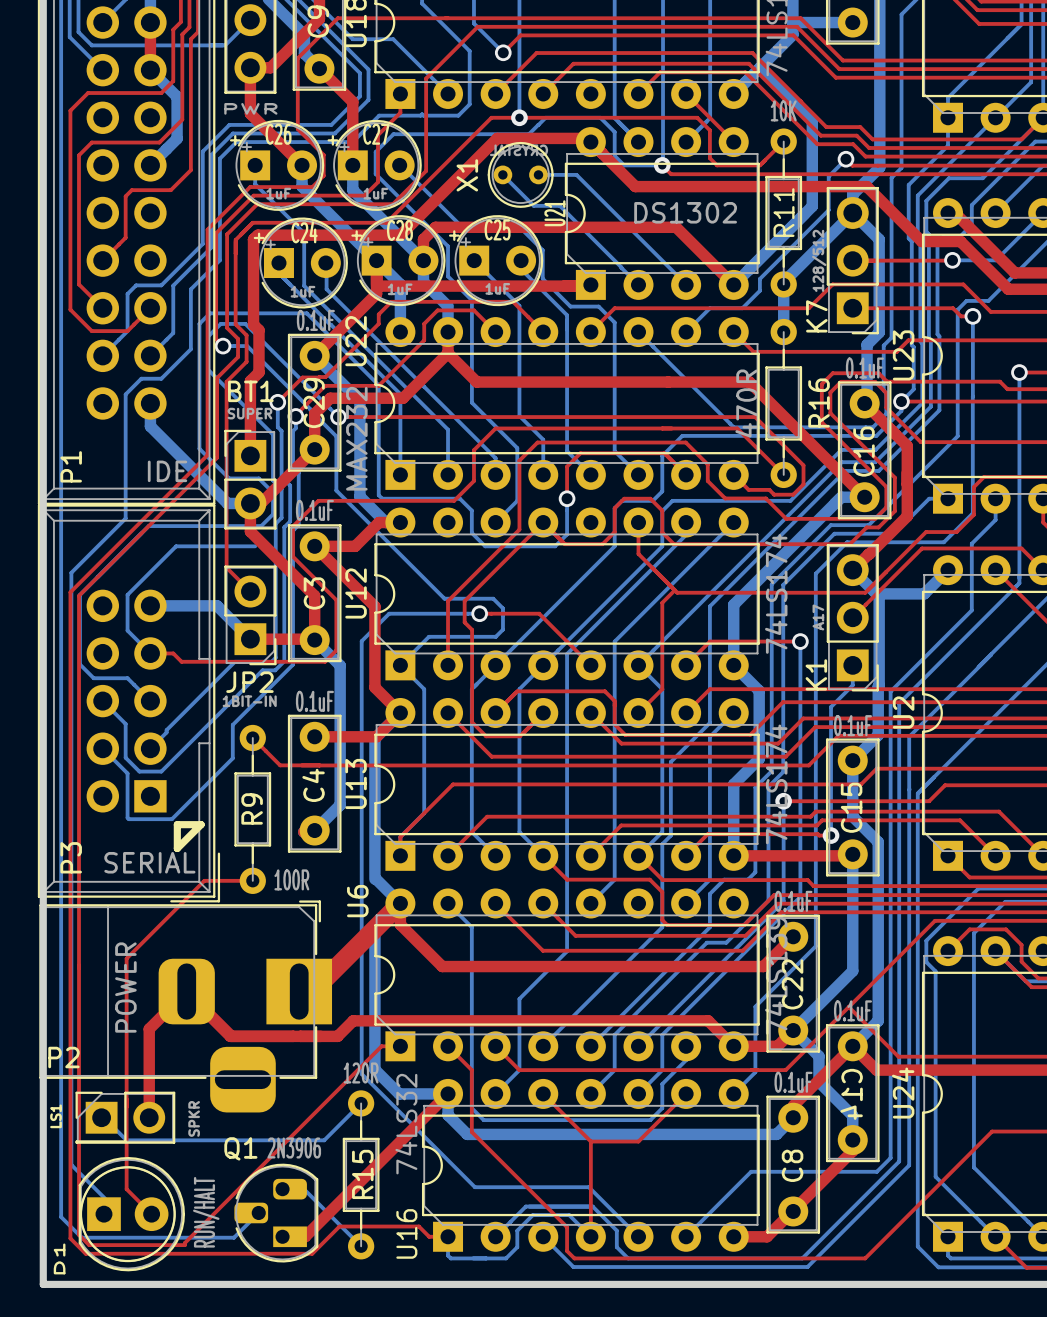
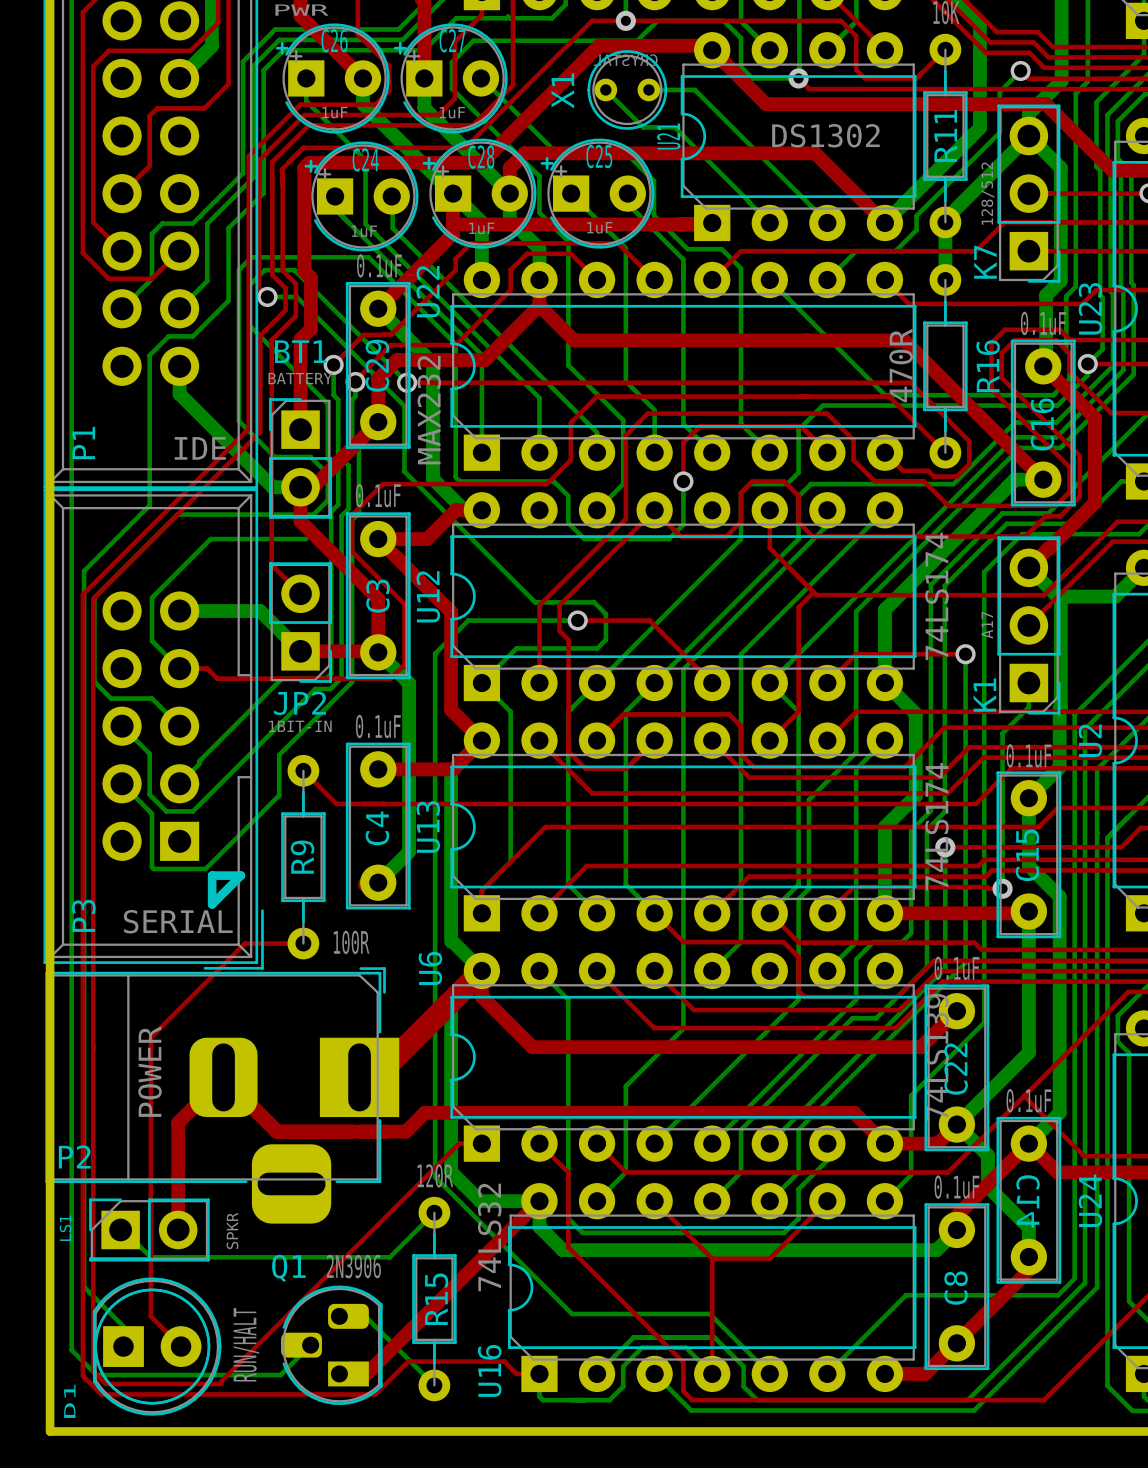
BT1 value: SUPER (249, 413) -> BATTERY (300, 378)

